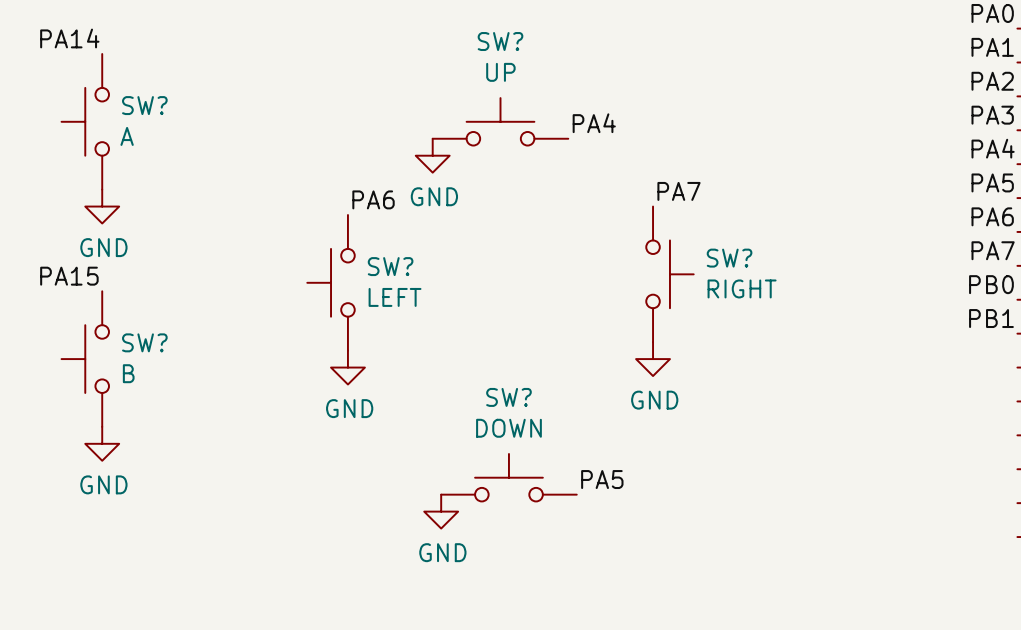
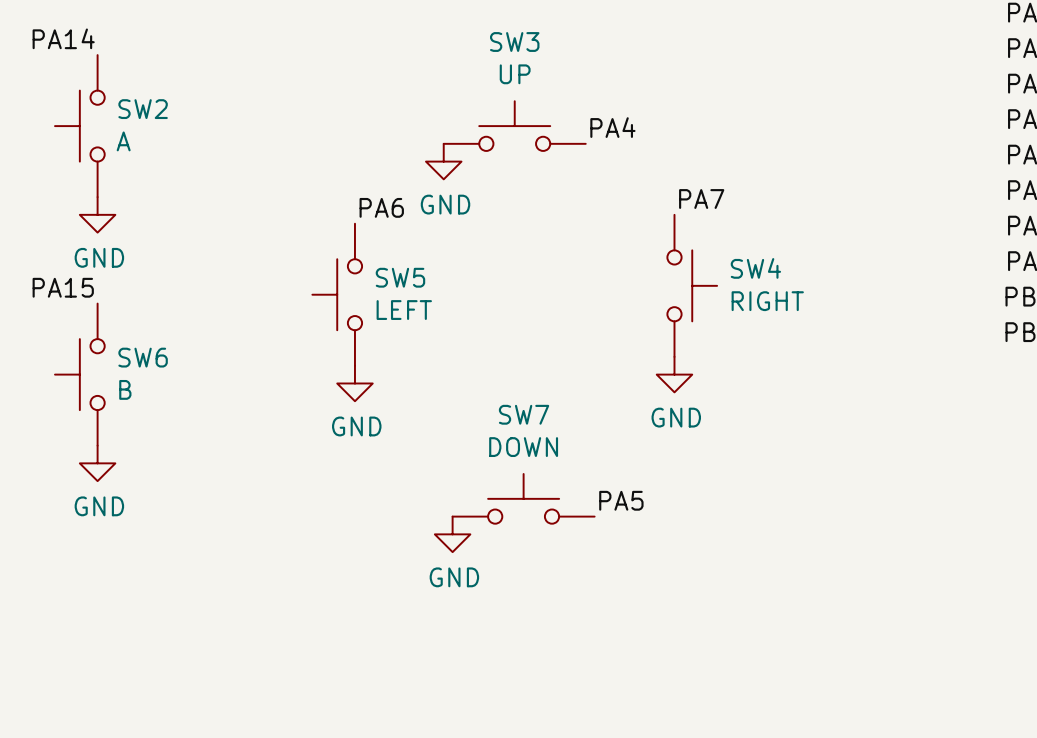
SW? name: SW? (500, 41) -> SW3 (514, 42)
SW? name: SW? (144, 105) -> SW2 (143, 109)
SW? name: SW? (729, 258) -> SW4 (755, 268)
SW? name: SW? (390, 266) -> SW5 (400, 277)
SW? name: SW? (144, 342) -> SW6 (143, 357)
SW? name: SW? (508, 397) -> SW7 (524, 414)

